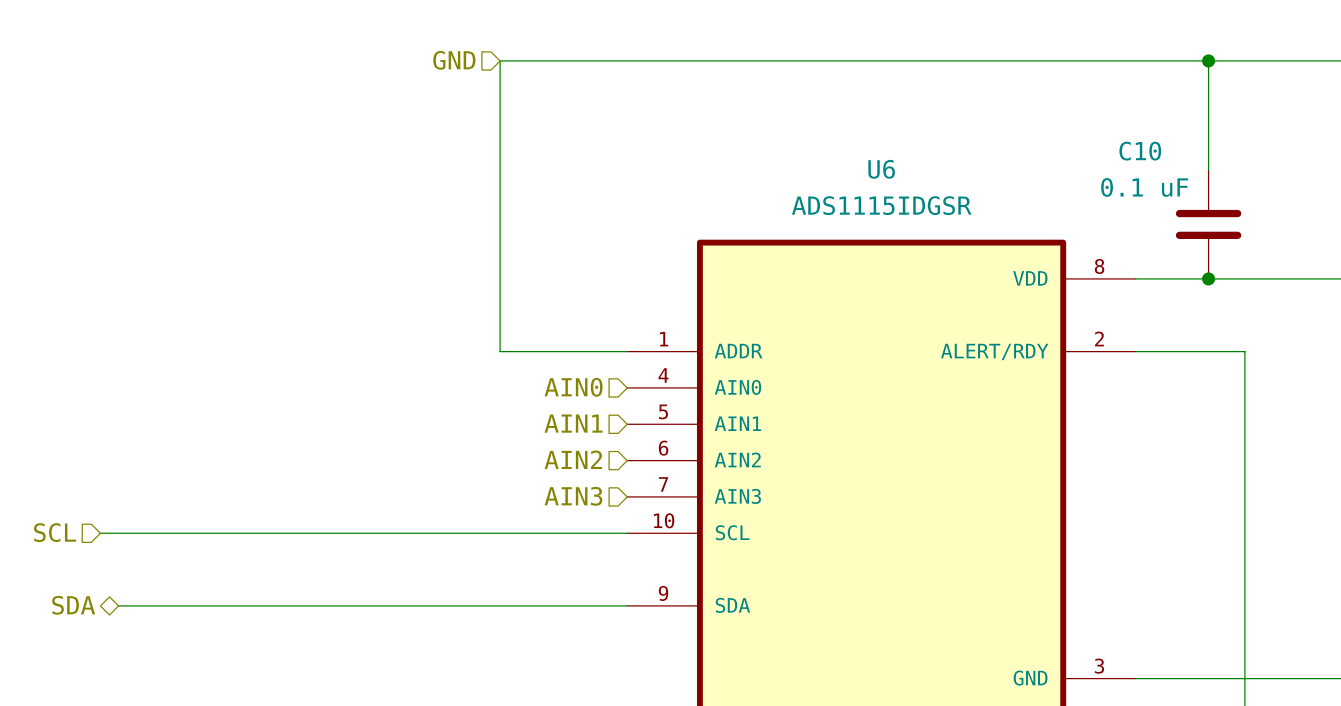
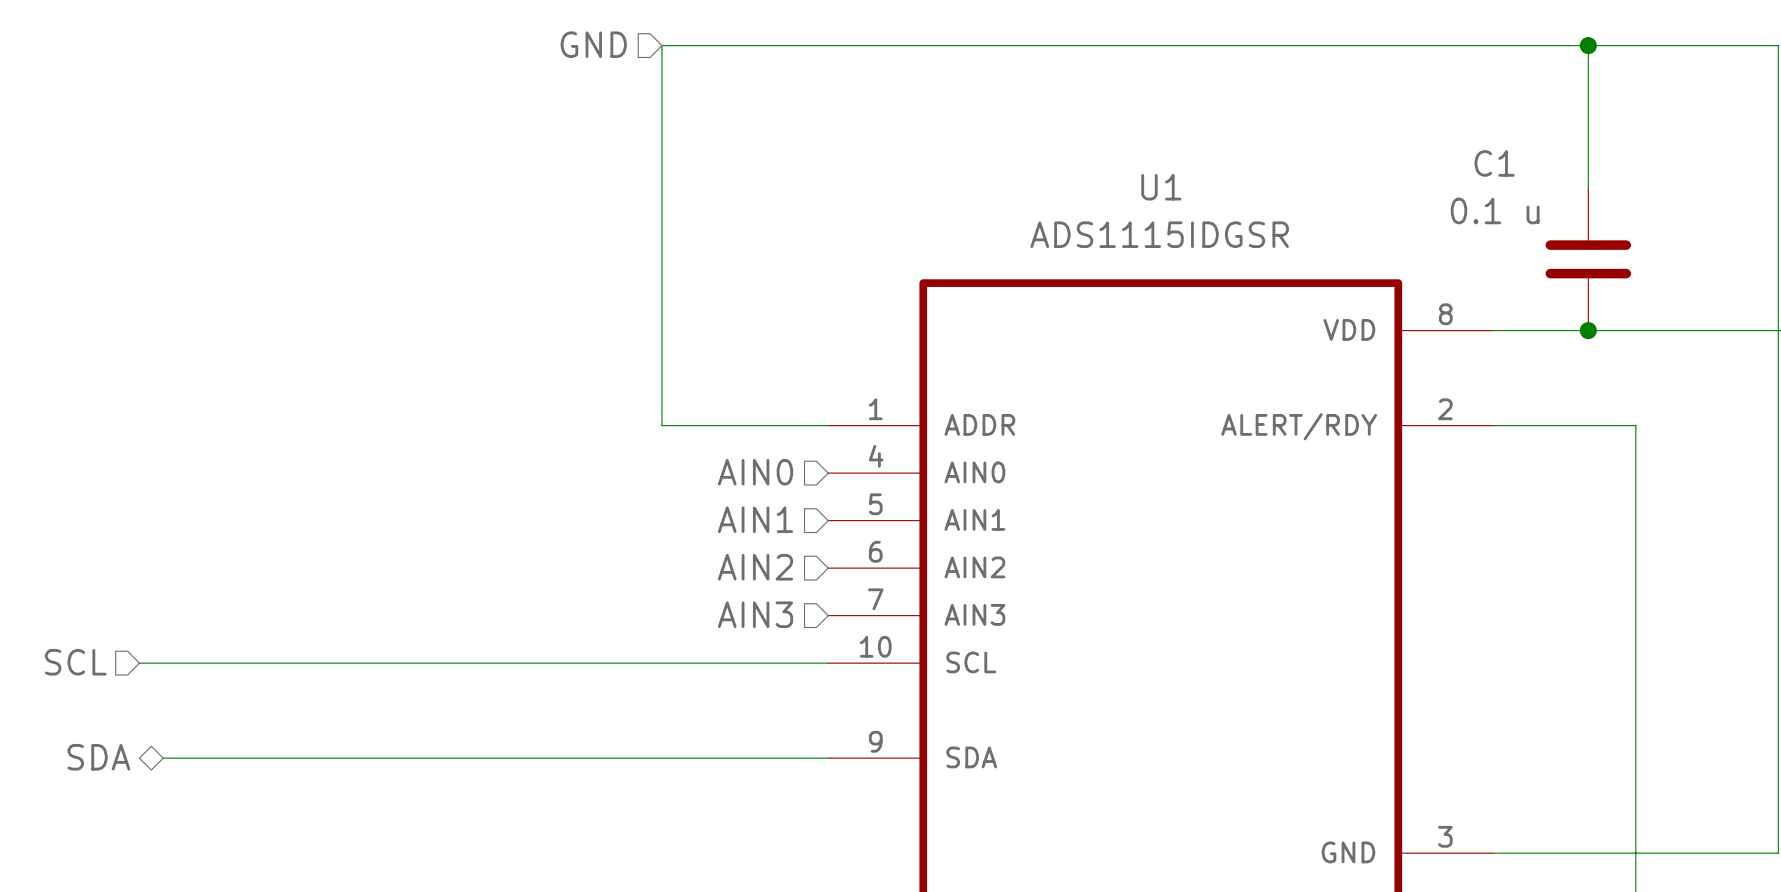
C10 name: C10 (1140, 151) -> C1 (1494, 163)
U6 name: U6 (881, 169) -> U1 (1161, 187)
C10 value: 0.1 uF (1144, 187) -> 0.1 u (1495, 210)

